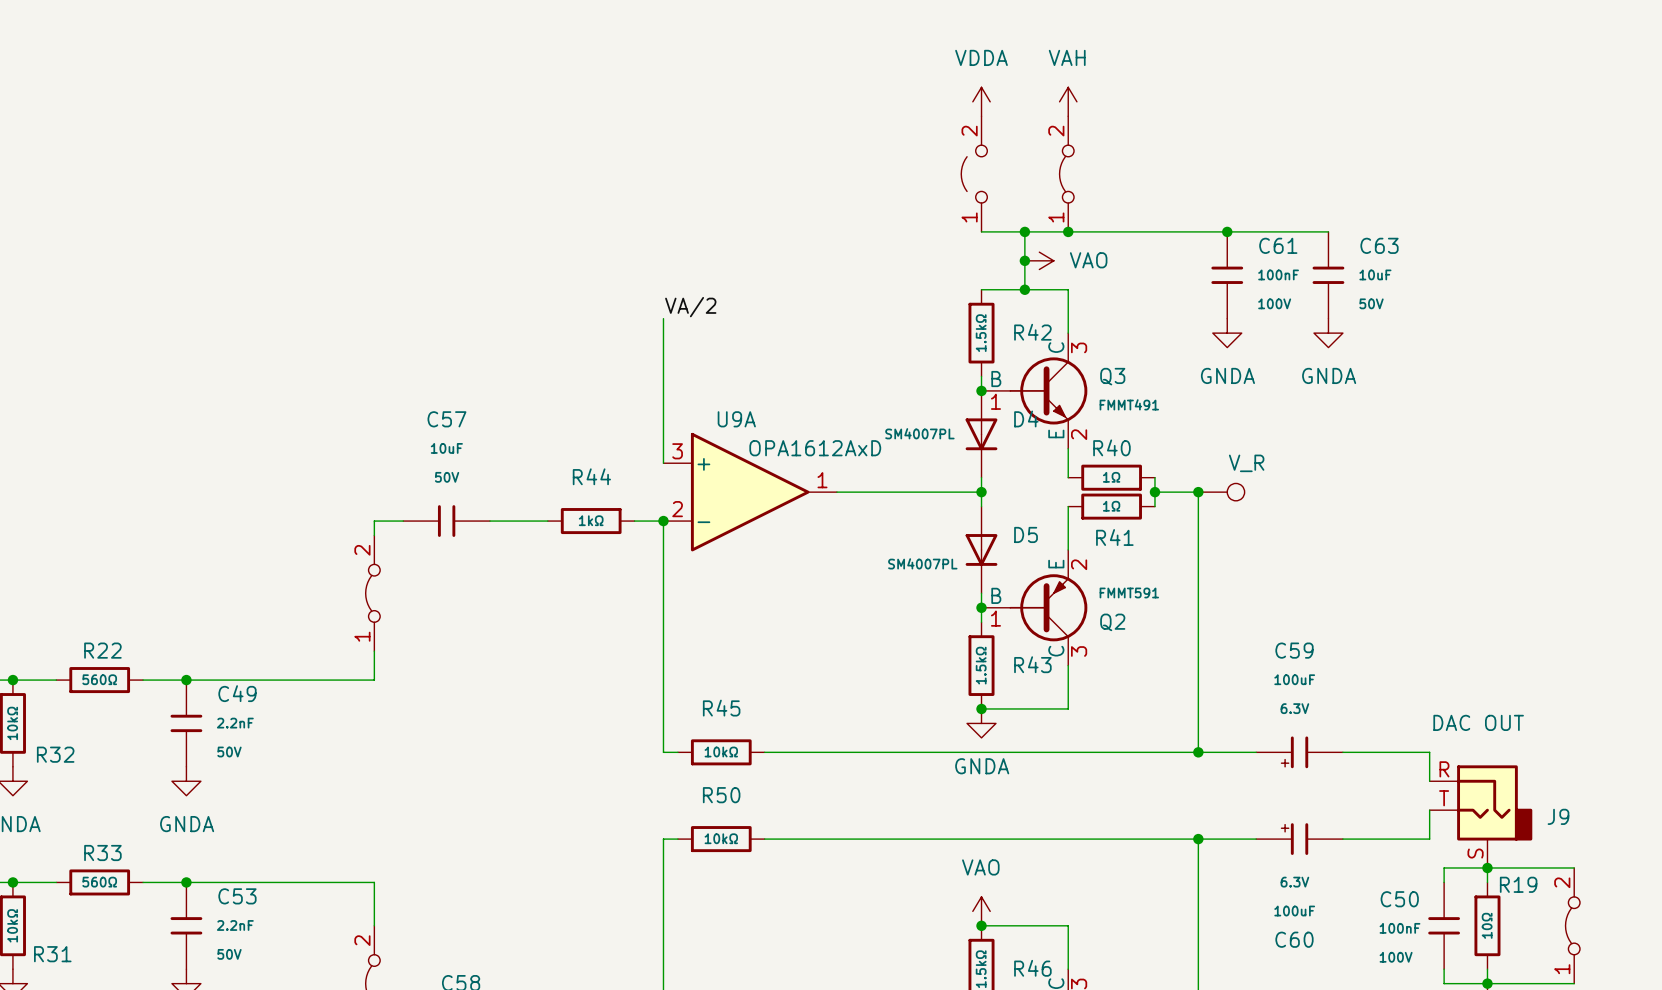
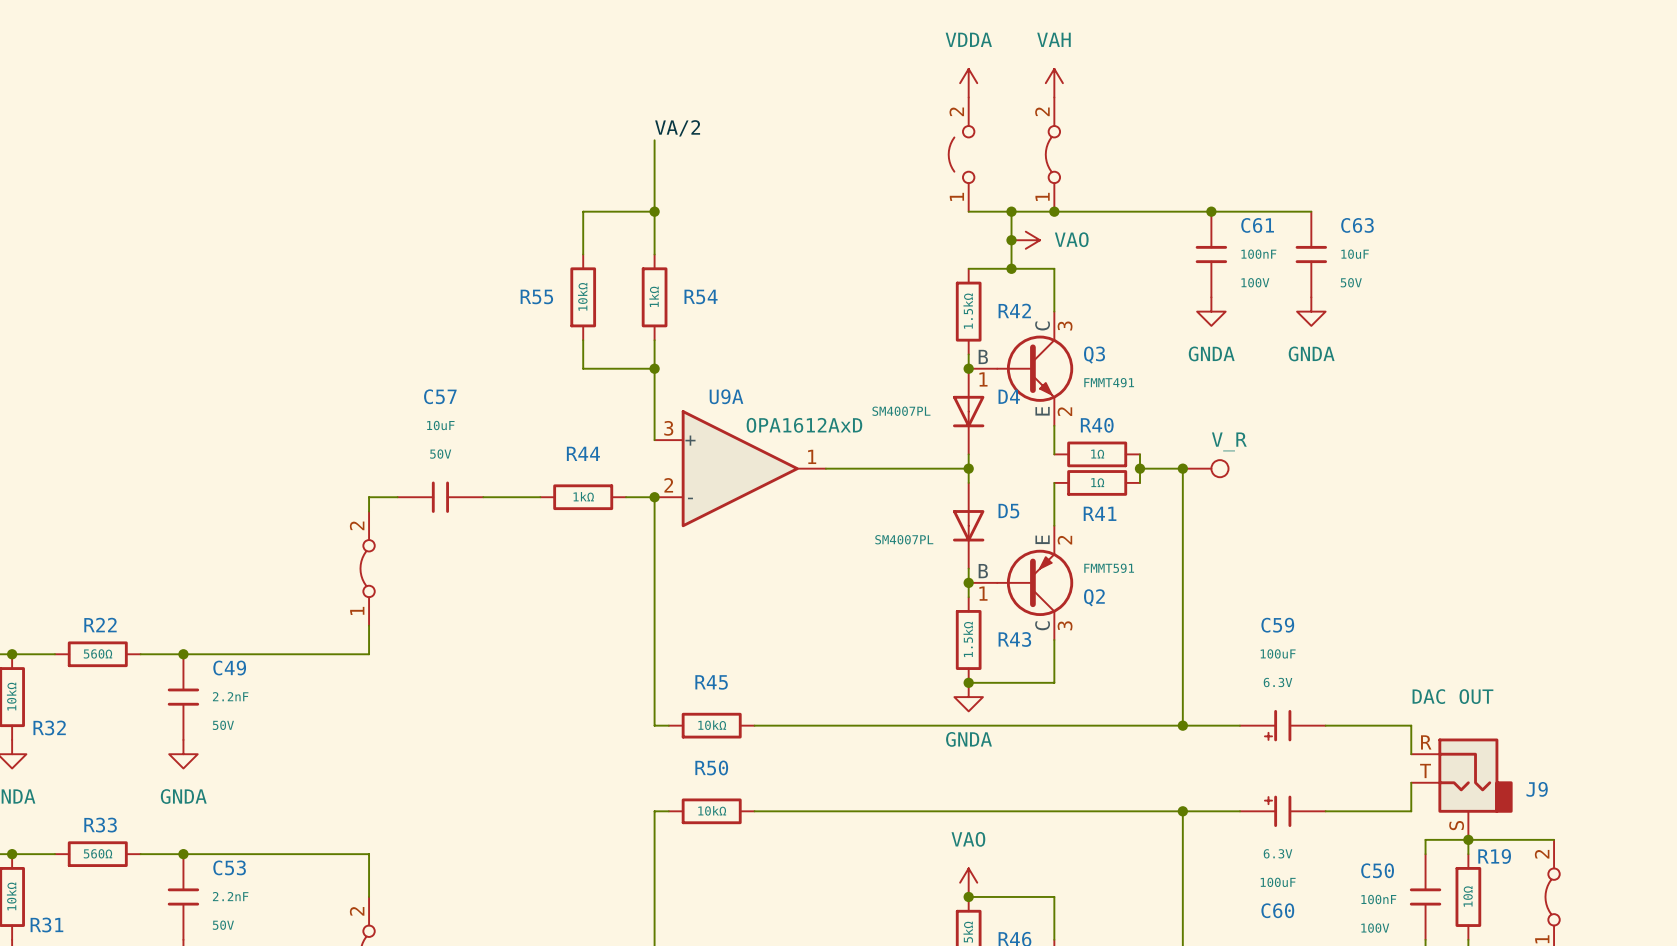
wire: none -> (654, 140) (654, 254)
wire: none -> (654, 211) (583, 211) (583, 254)
junction: none -> (654, 211)
label position: VA/2 (690, 307) -> VA/2 (677, 128)
R55: none -> 10kΩ (583, 297)
wire: (663, 318) (663, 362) -> none
R54: none -> 1kΩ (654, 297)
wire: none -> (583, 340) (583, 368) (654, 368)
junction: none -> (654, 368)

